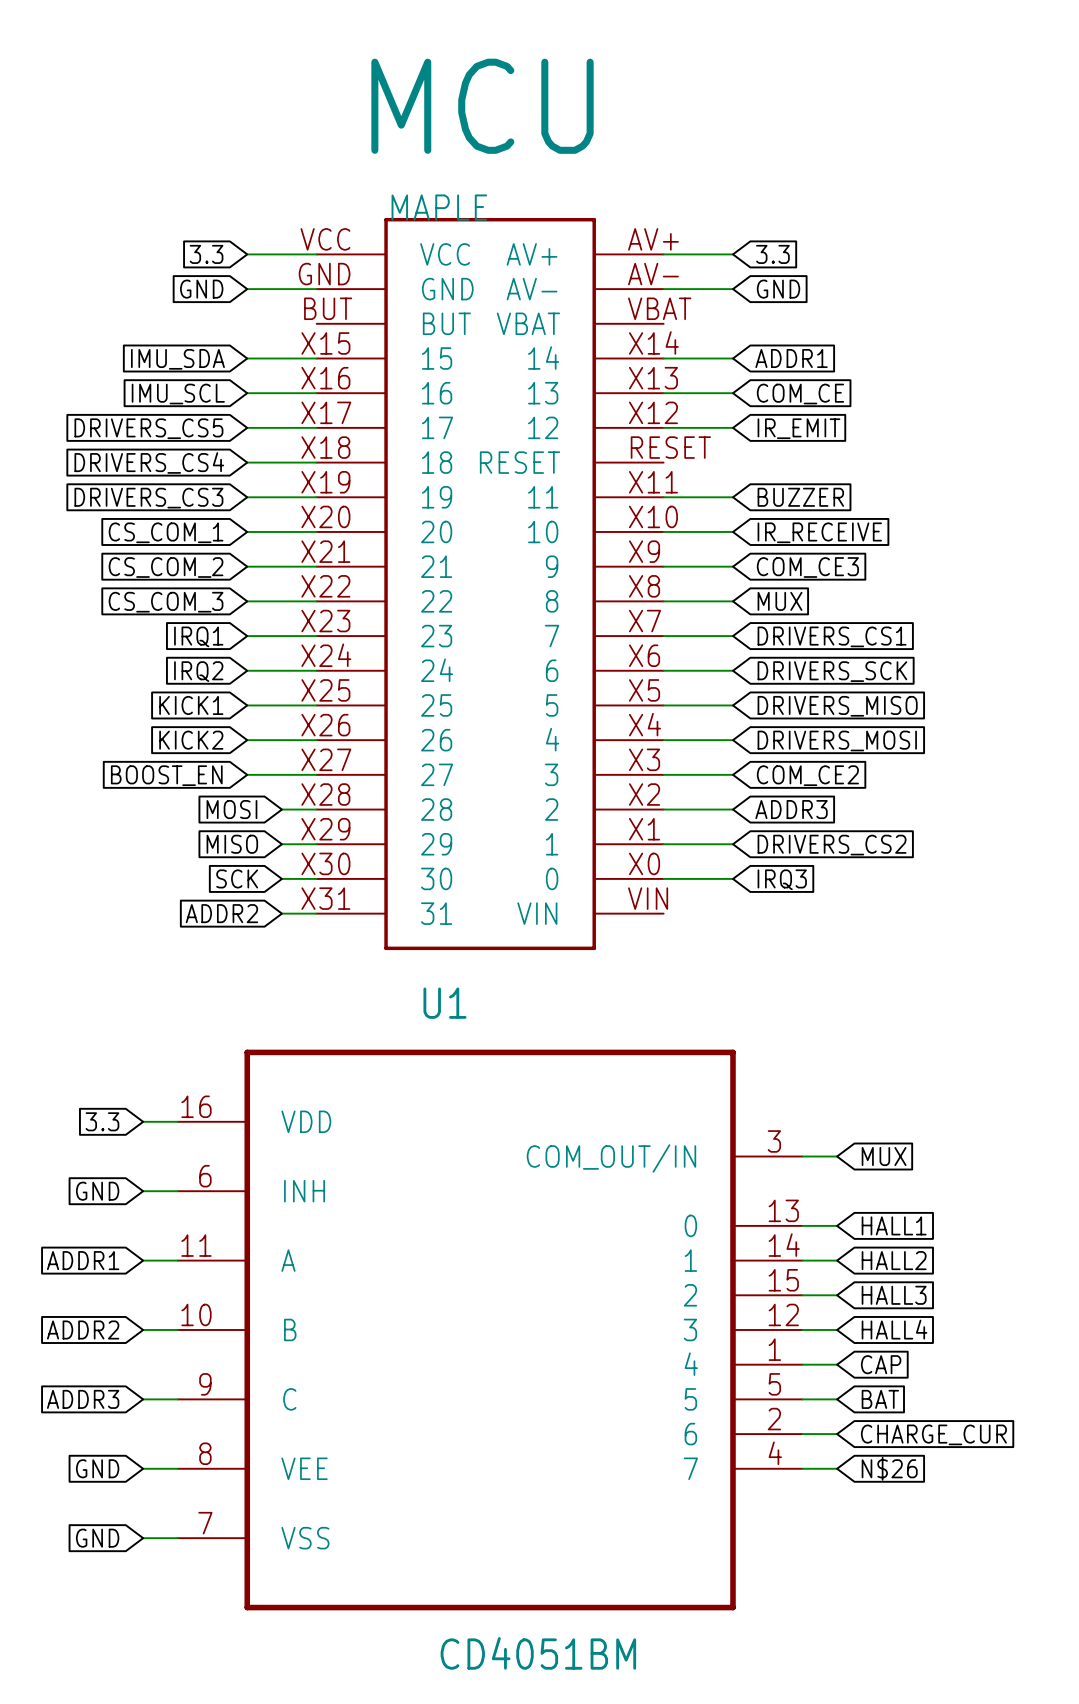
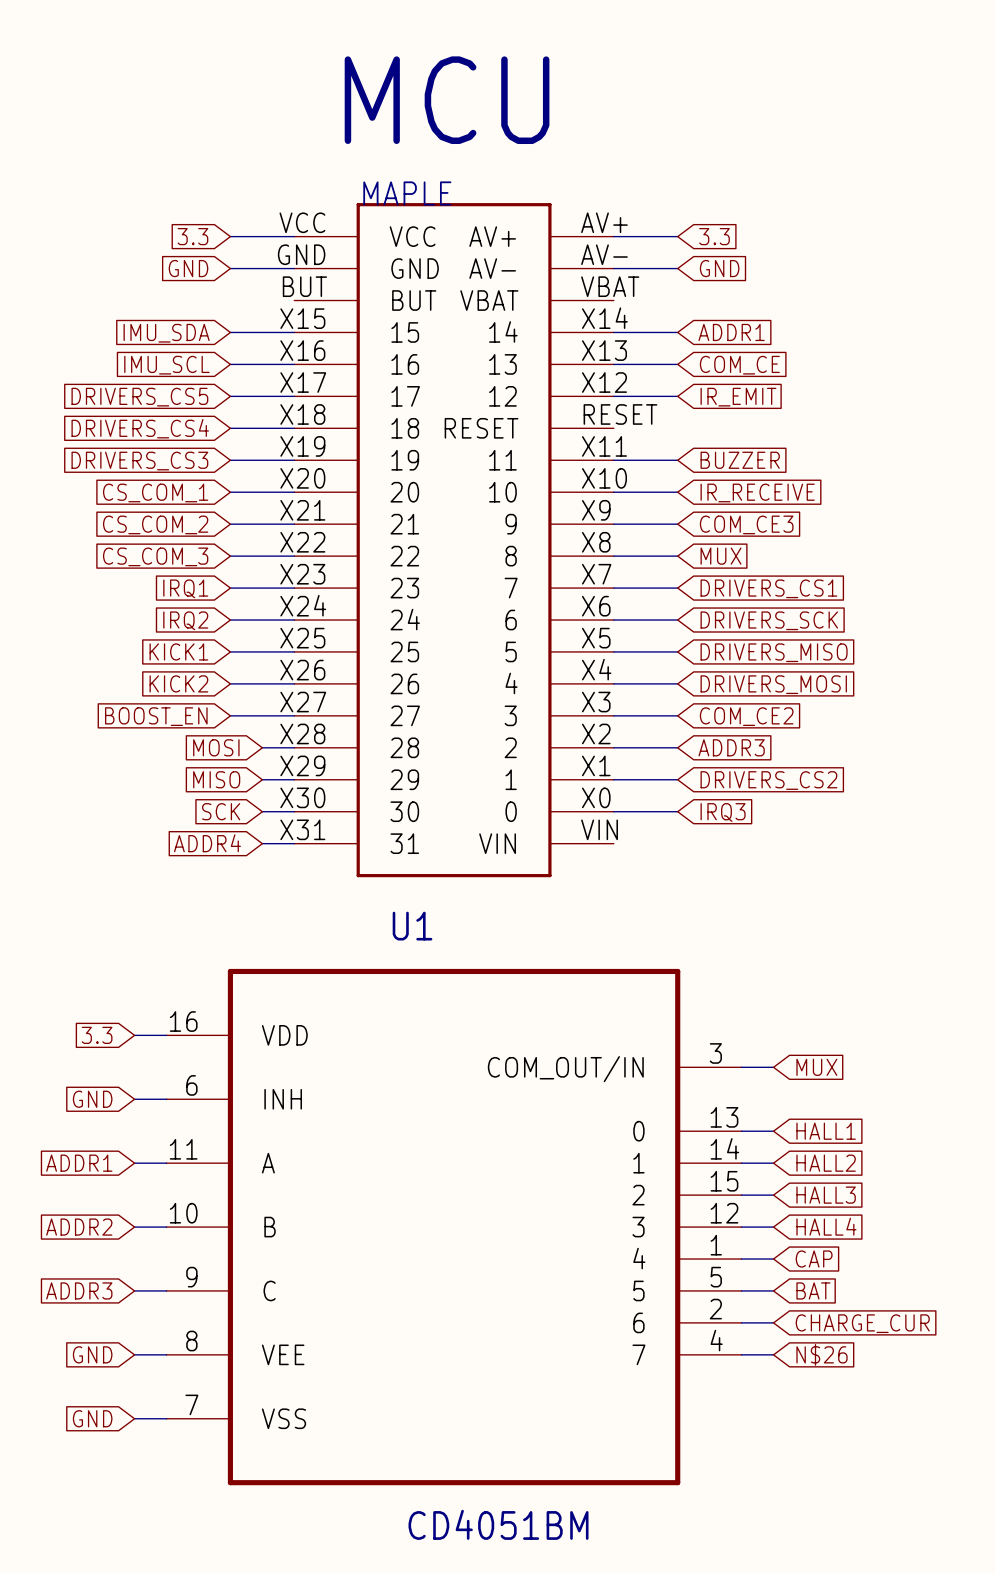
global label: ADDR2 (221, 913) -> ADDR4 (207, 843)

